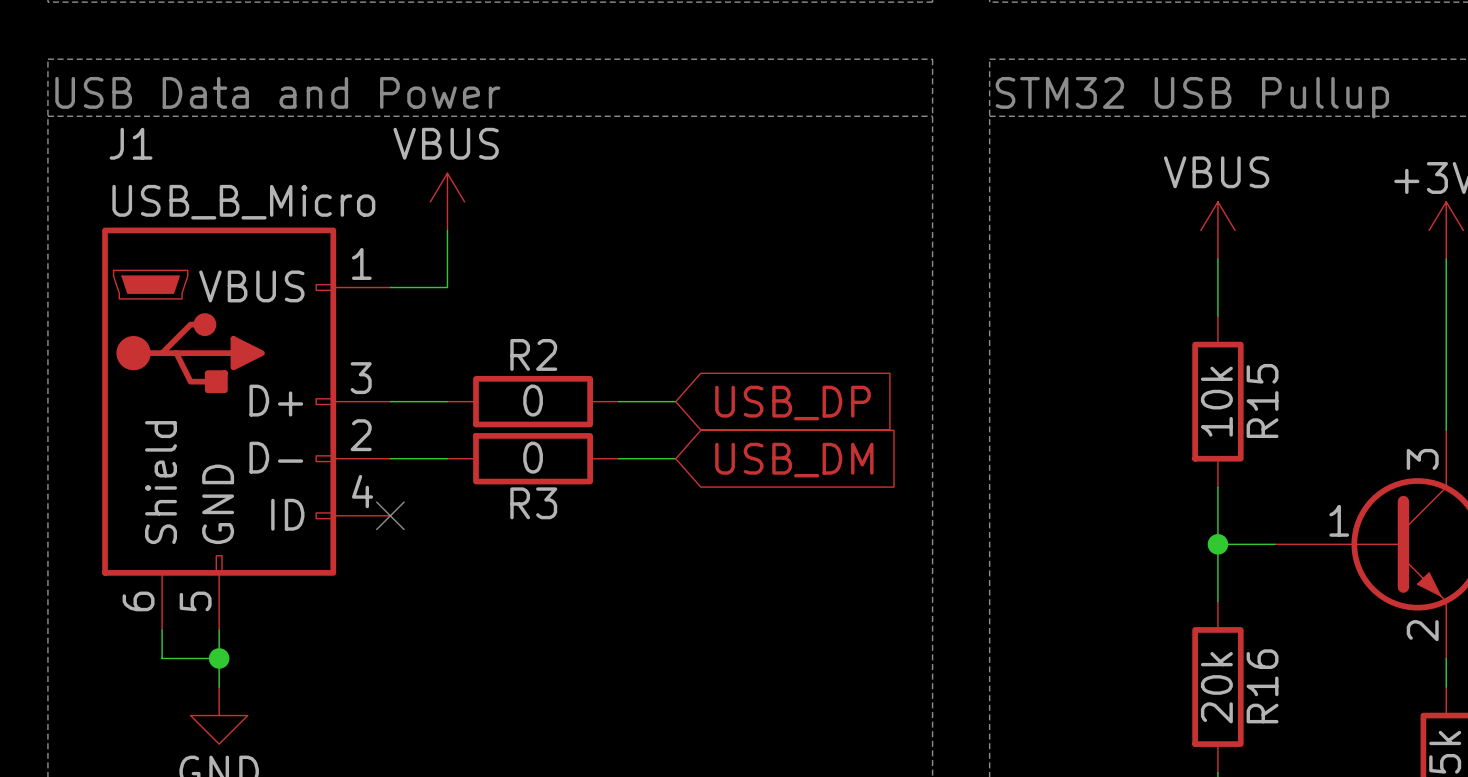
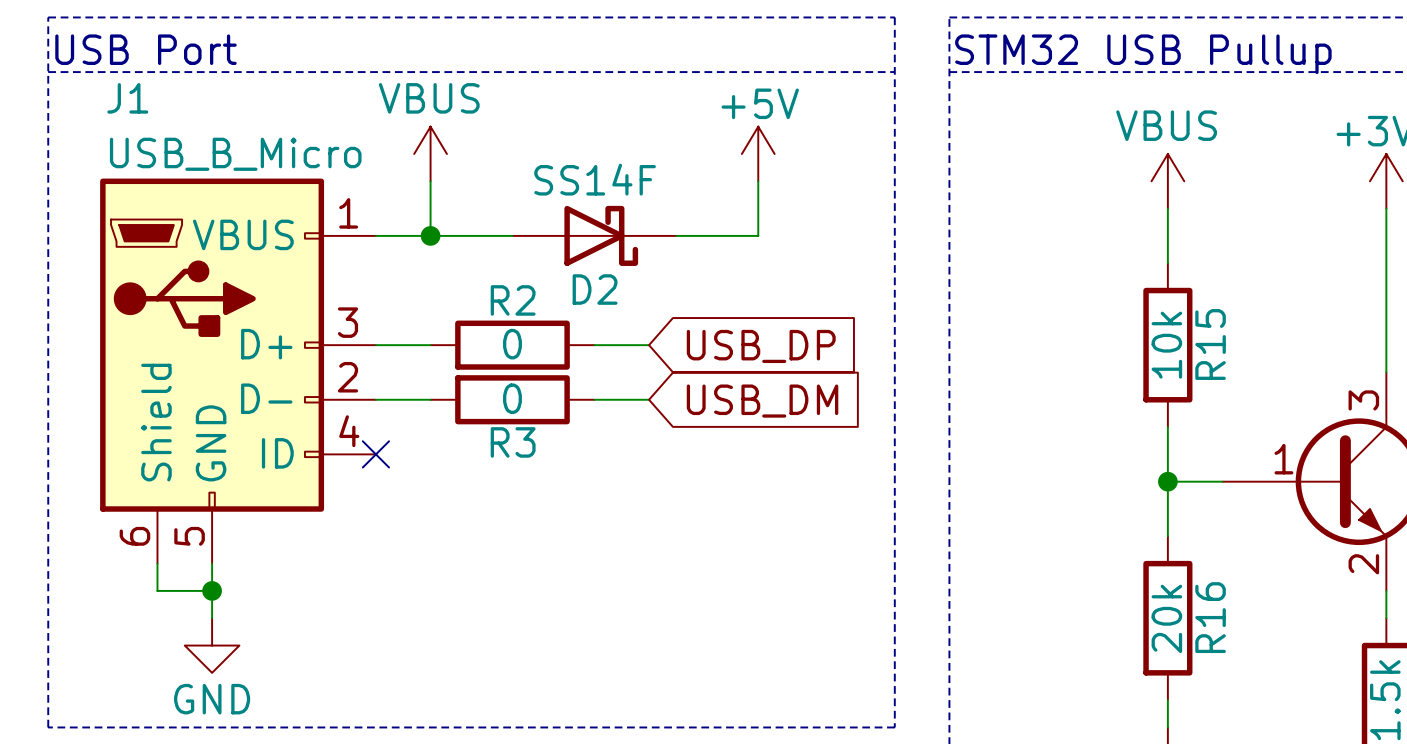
text: USB Data and Power (277, 92) -> USB Port (145, 49)
power symbol: none -> +5V (758, 153)
wire: none -> (758, 181) (758, 235) (676, 235)
wire: none -> (430, 235) (512, 235)
junction: none -> (430, 235)
D2: none -> SS14F (594, 235)

